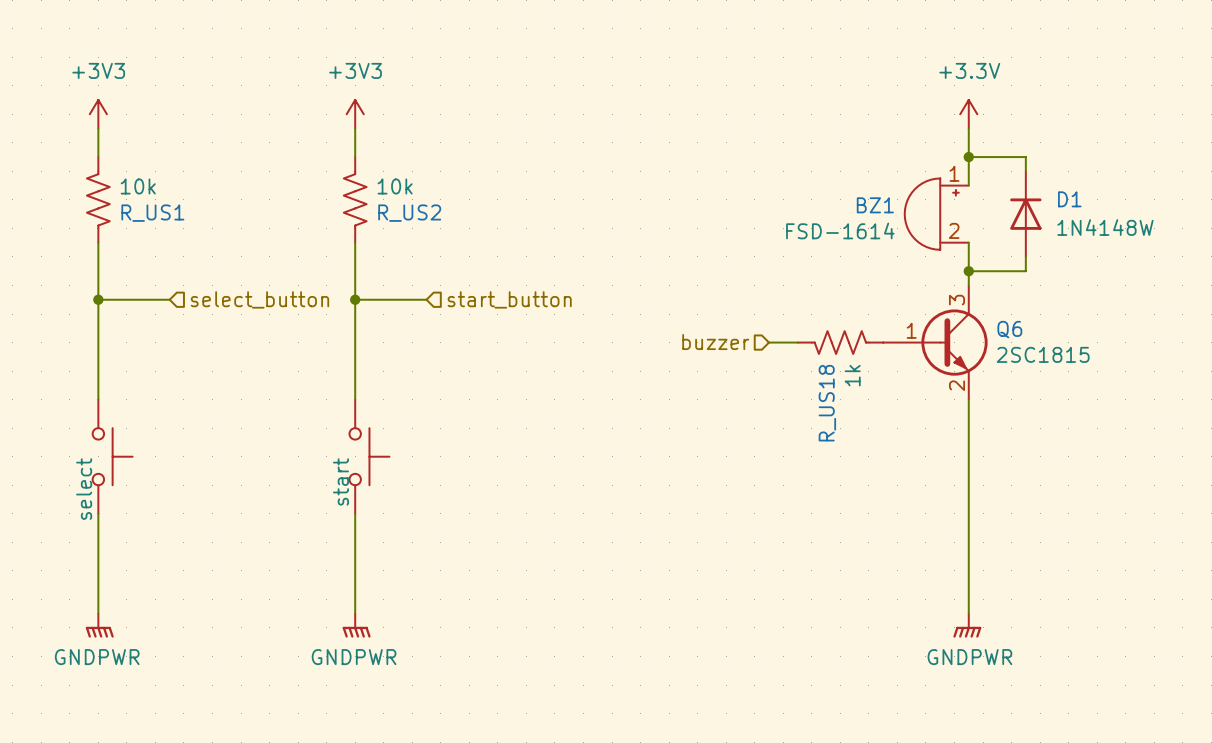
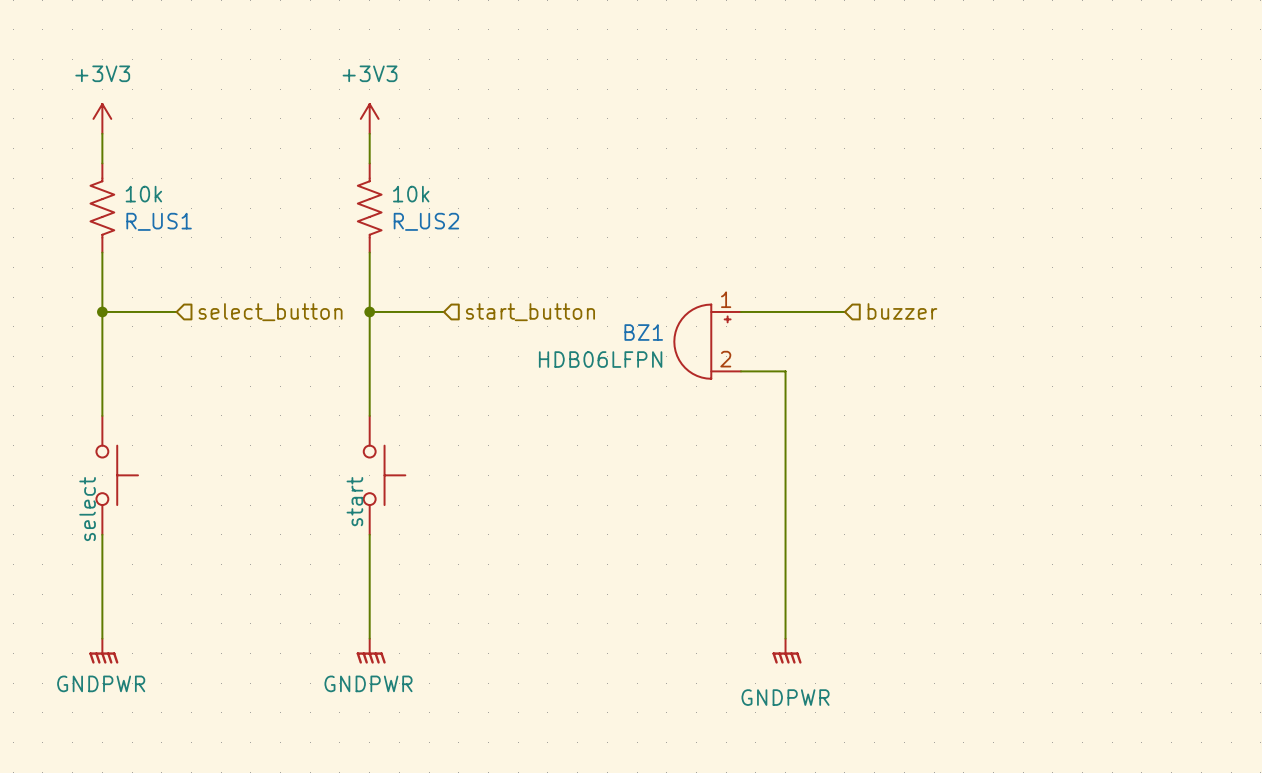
power symbol: +3.3V (968, 114) -> none
wire: (968, 128) (968, 185) -> none
wire: (968, 157) (1025, 157) (1025, 171) -> none
junction: (968, 157) -> none
BZ1 position: (936, 214) -> (707, 341)
D1: 1N4148W (1025, 214) -> none
BZ1 value: FSD-1614 (840, 230) -> HDB06LFPN (600, 359)
wire: (968, 242) (968, 285) -> none
wire: (1025, 256) (1025, 271) (968, 271) -> none
junction: (968, 271) -> none
wire: none -> (740, 311) (844, 311)
hierarchical label rotation: 0° (715, 342) -> 180° (902, 311)
hierarchical label position: buzzer (715, 342) -> buzzer (902, 311)
wire: (769, 342) (797, 342) -> none
R_US18: 1k (840, 342) -> none
Q6: 2SC1815 (935, 342) -> none
wire: none -> (740, 371) (785, 371) (785, 638)
wire: (968, 399) (968, 613) -> none
power symbol: none -> GNDPWR (787, 651)
power symbol: GNDPWR (967, 625) -> none

